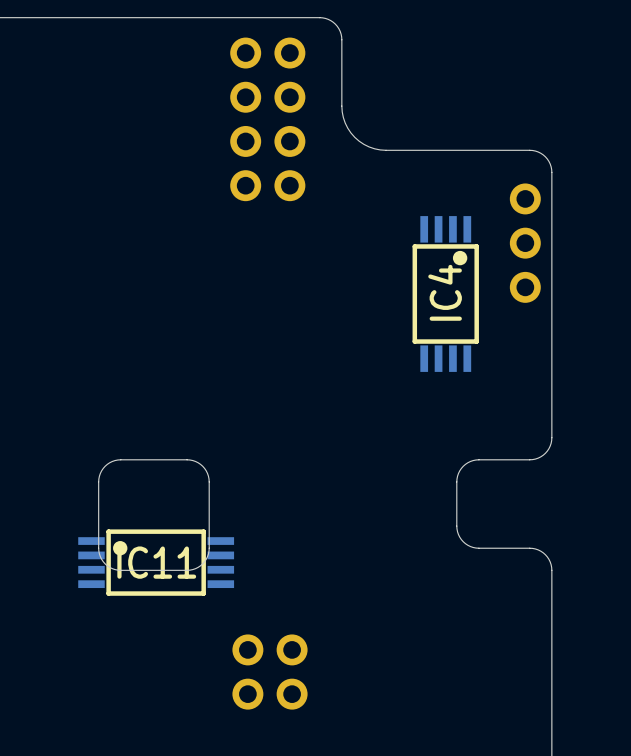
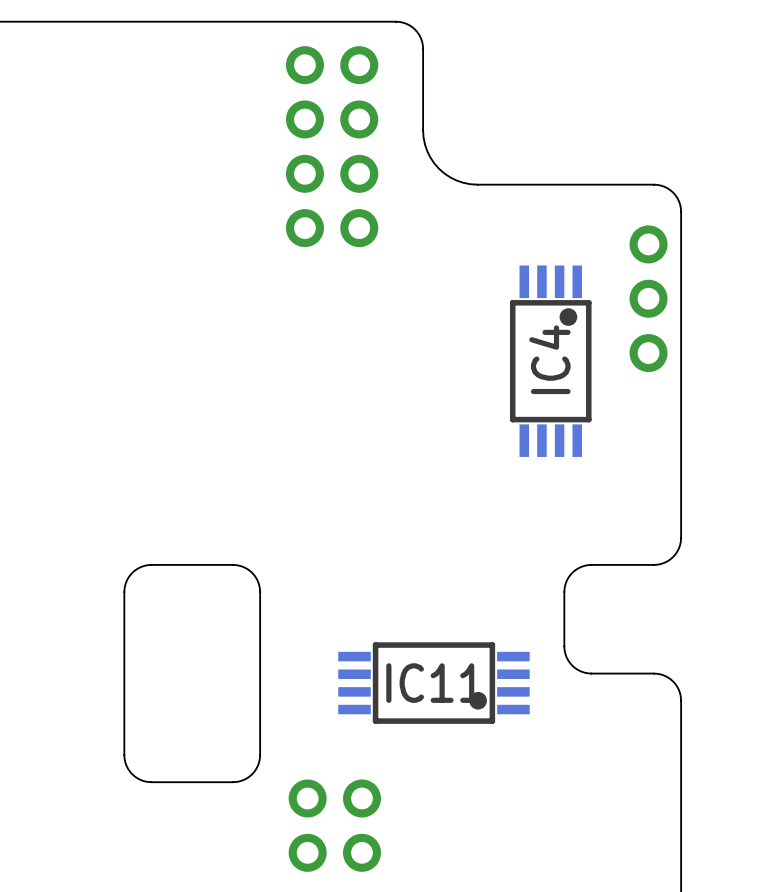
board edge: (209, 548) (207, 556) (202, 563) (195, 568) (187, 570) (115, 569) (103, 561) (98, 548) -> (260, 673) (259, 762) (249, 776) (232, 782) (147, 781) (132, 774) (124, 758) (124, 673)
IC11 rotation: 0° (156, 562) -> 180° (433, 683)
IC11 position: (156, 562) -> (433, 683)

